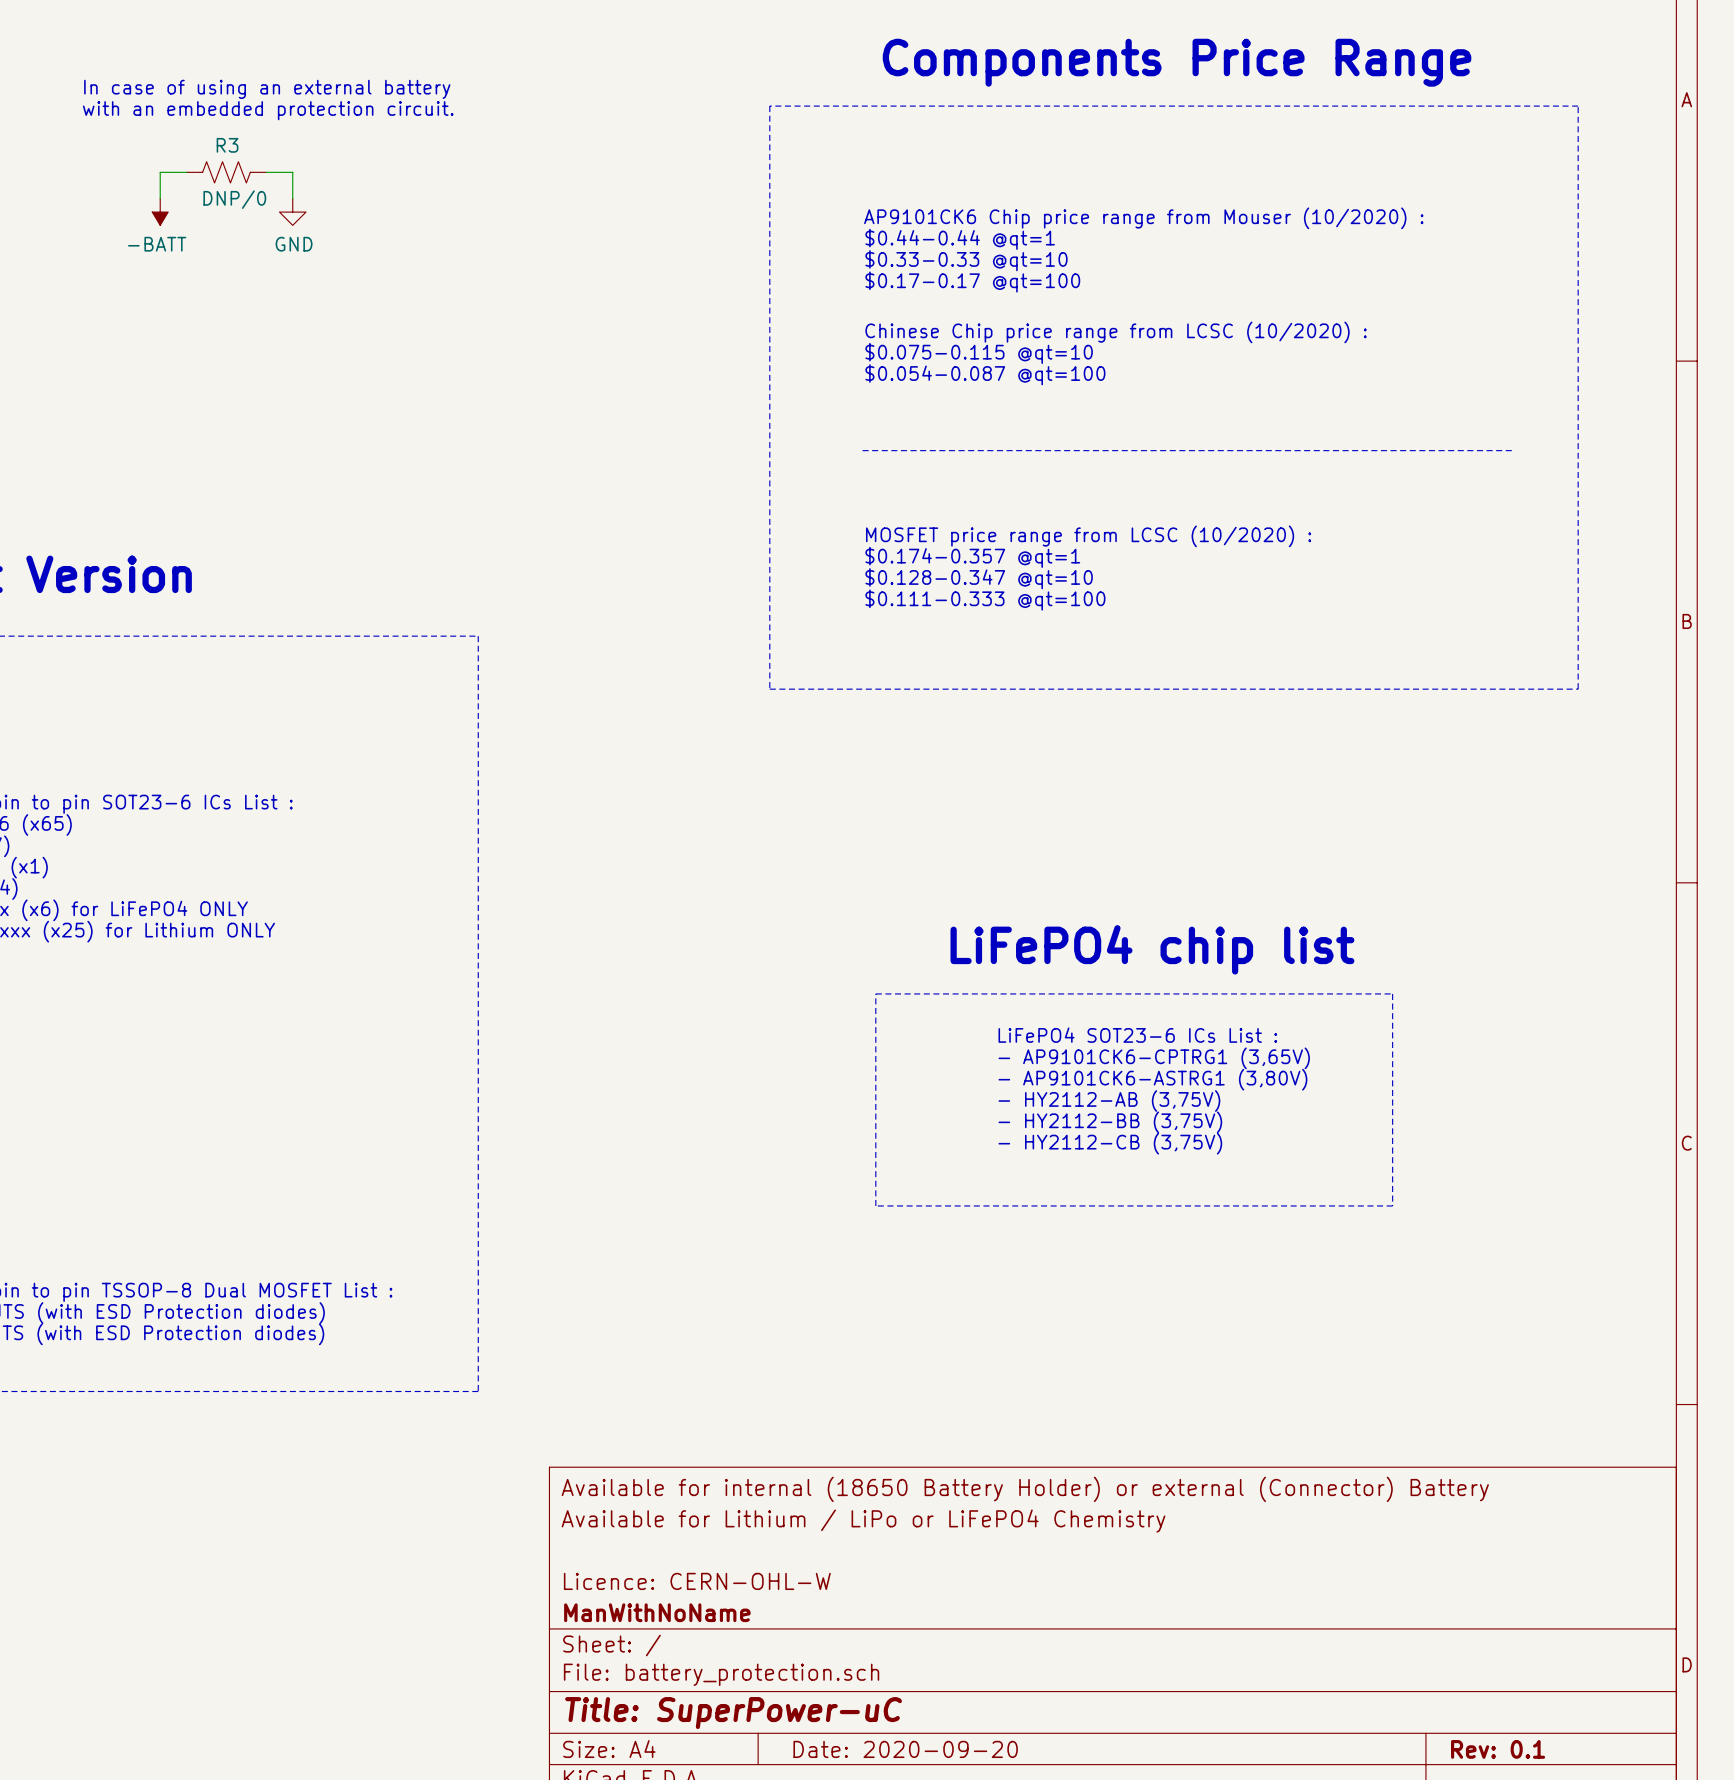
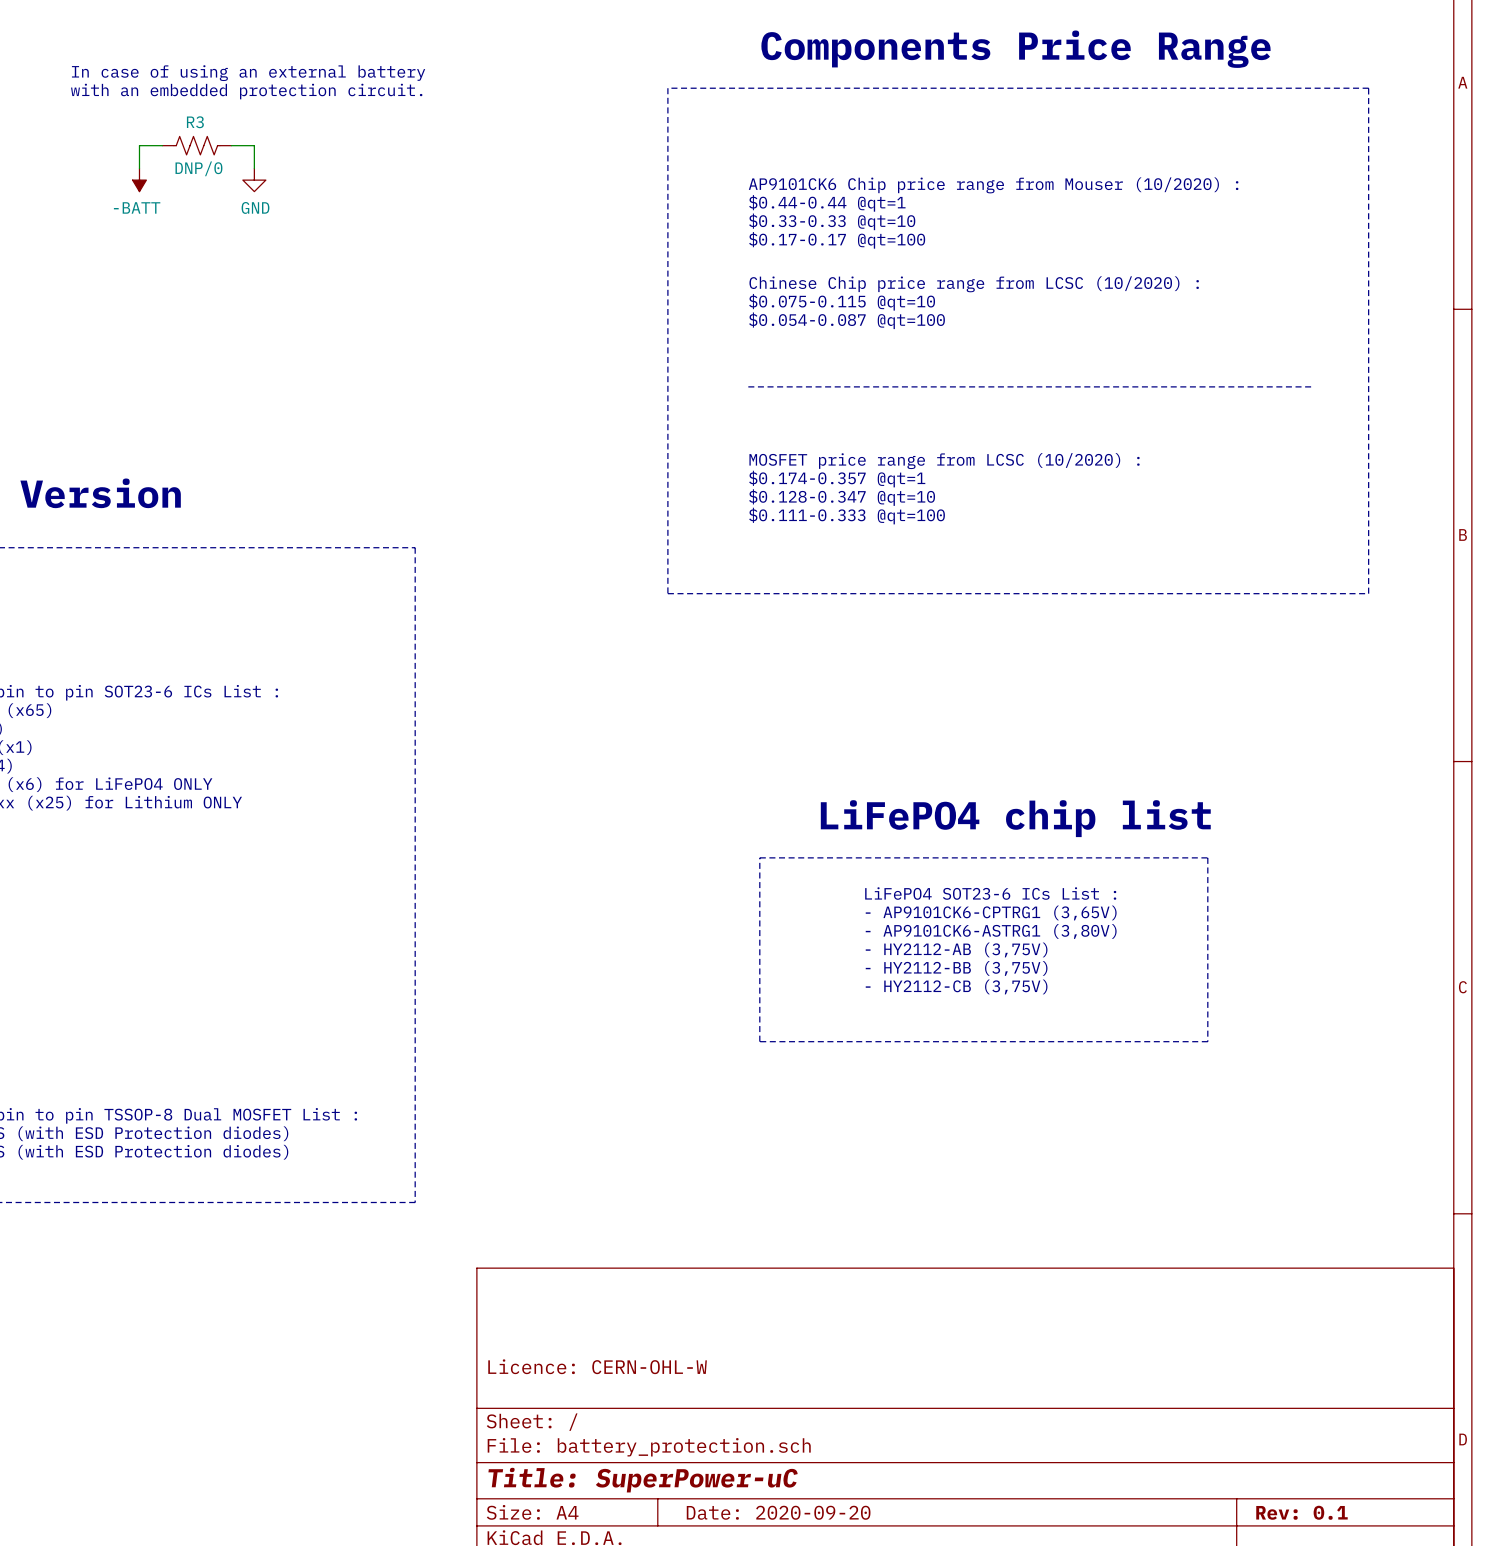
title block: Available for internal (18650 Battery Holder) or external (Connector) Battery (1025, 1489) -> none
title block: Available for Lithium / LiPo or LiFePO4 Chemistry (863, 1521) -> none
title block: ManWithNoName (657, 1612) -> none

